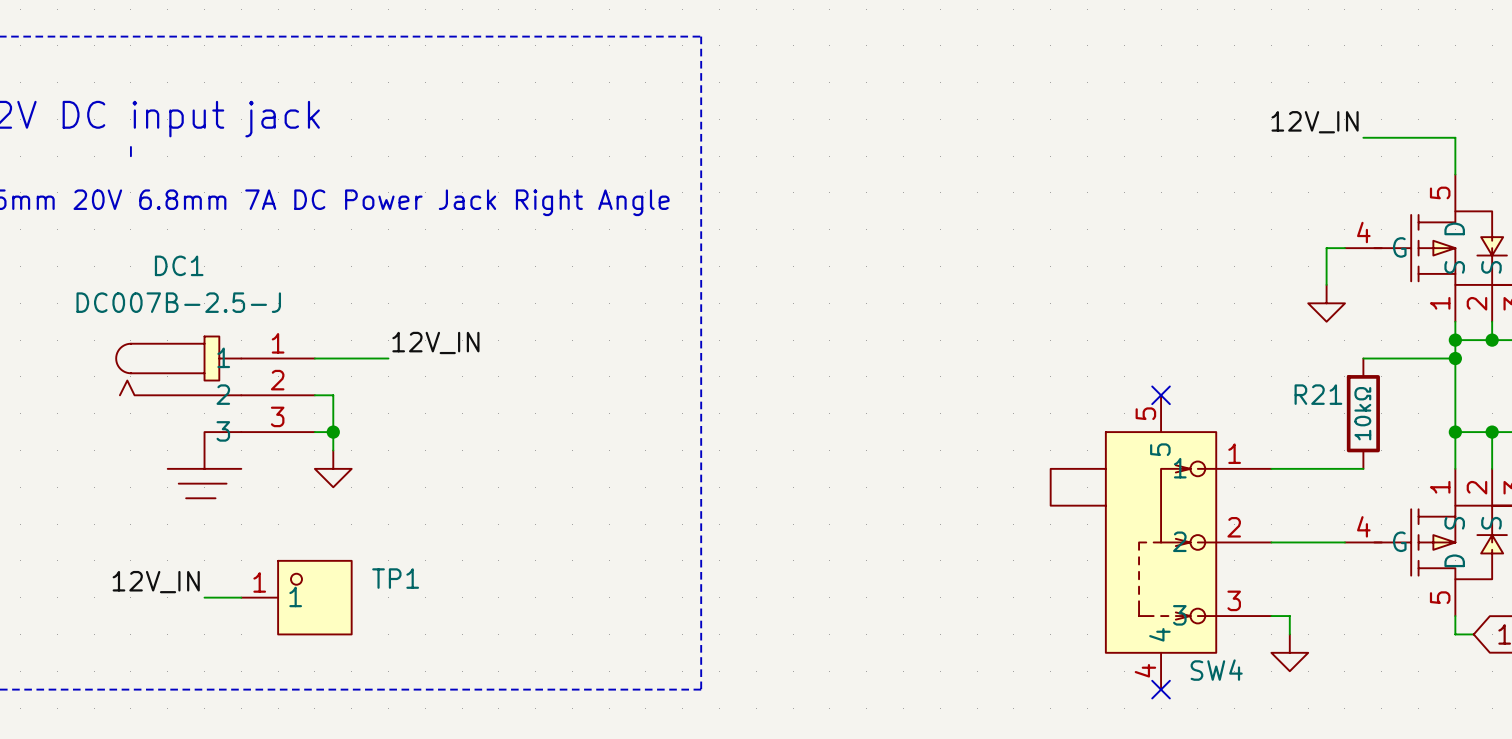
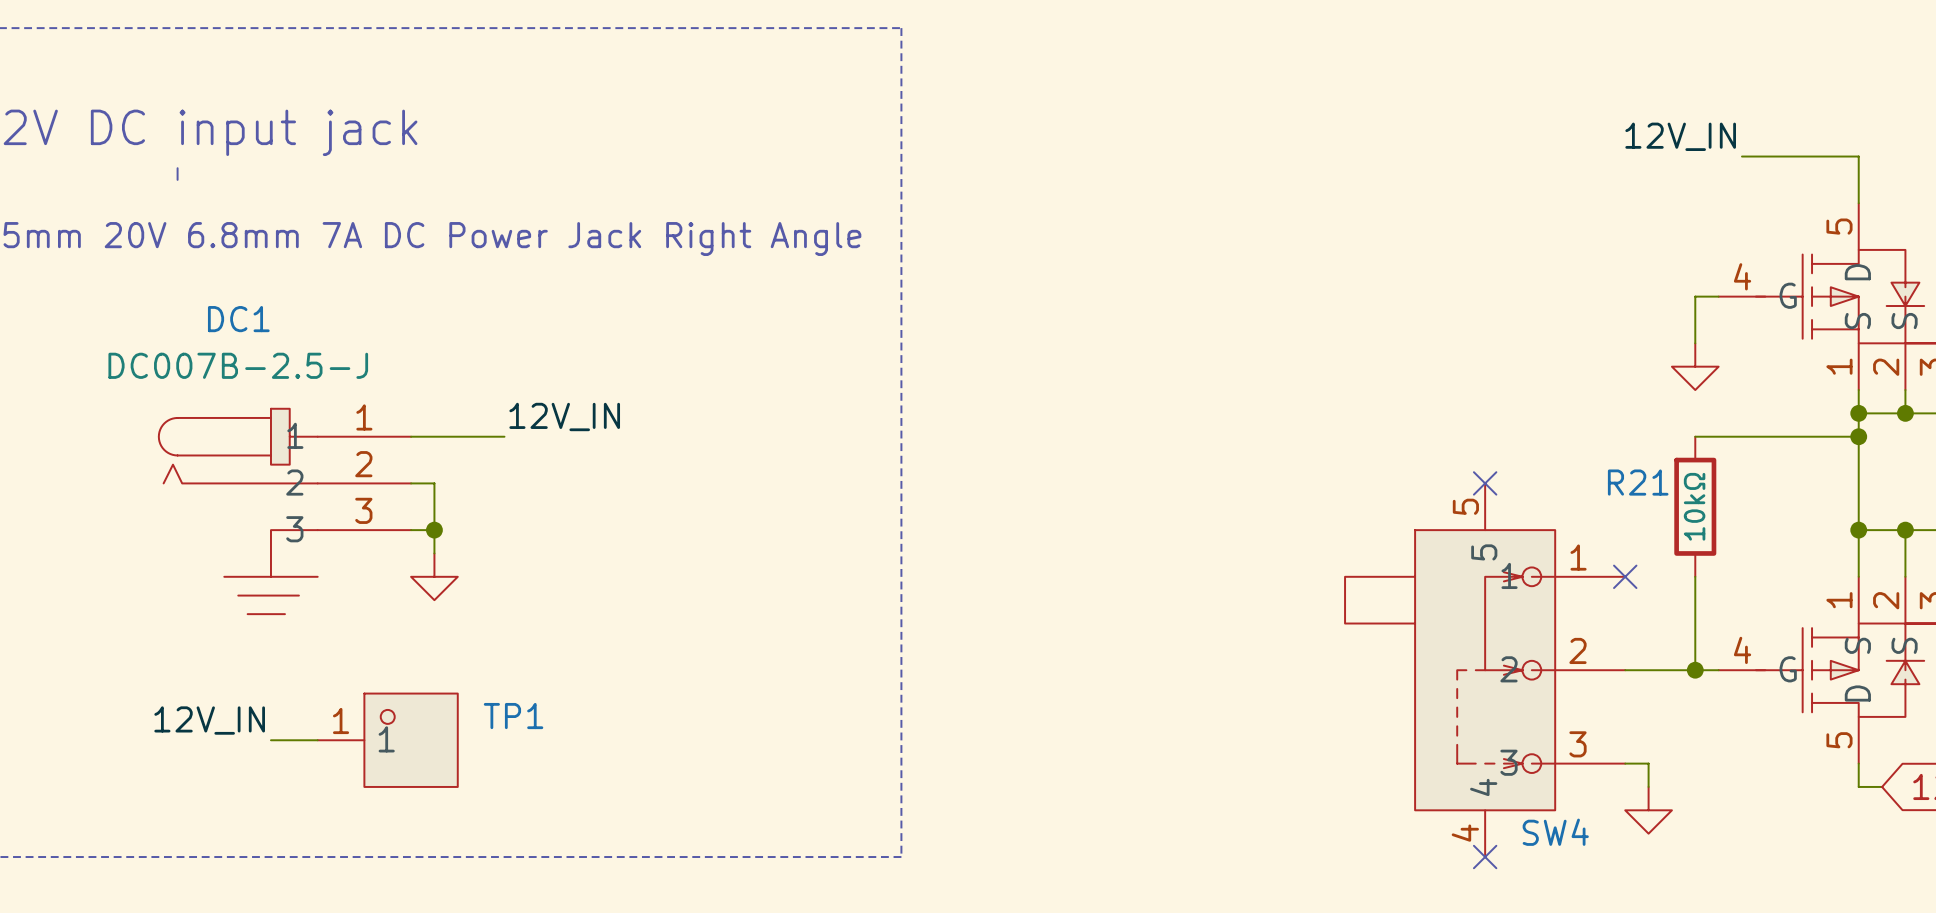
wire: none -> (1695, 436) (1741, 436)
R21 position: (1363, 413) -> (1695, 506)
wire: (1271, 468) (1363, 468) -> none
no-connect mark: none -> (1625, 576)
wire: none -> (1695, 576) (1695, 670)
junction: none -> (1695, 670)

